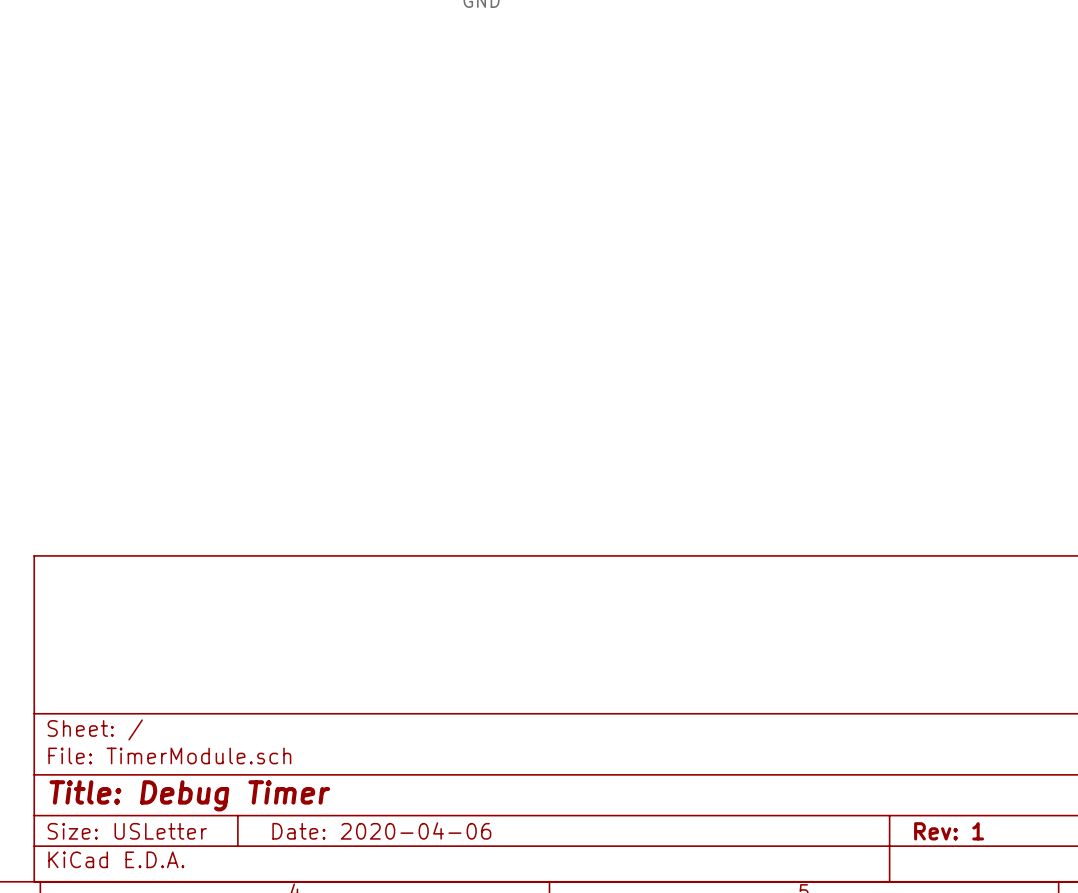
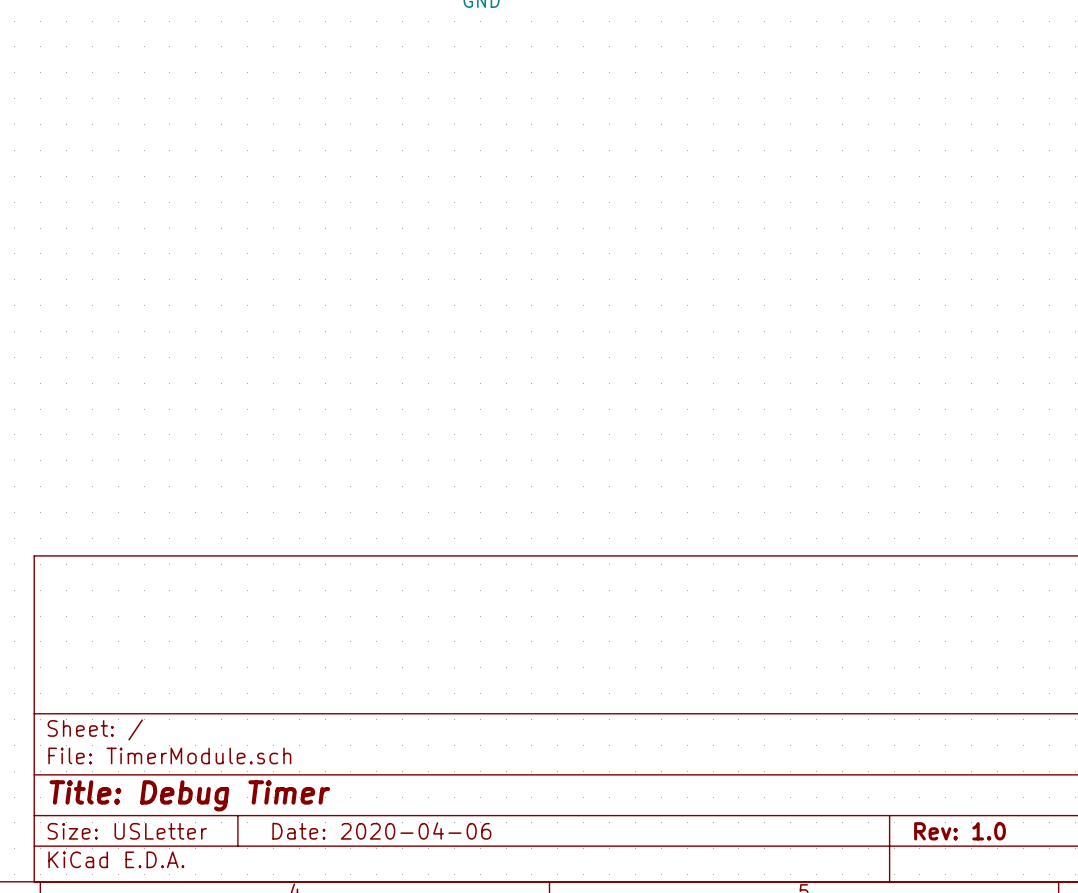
title block: Rev: 1 (949, 831) -> Rev: 1.0 (959, 831)

